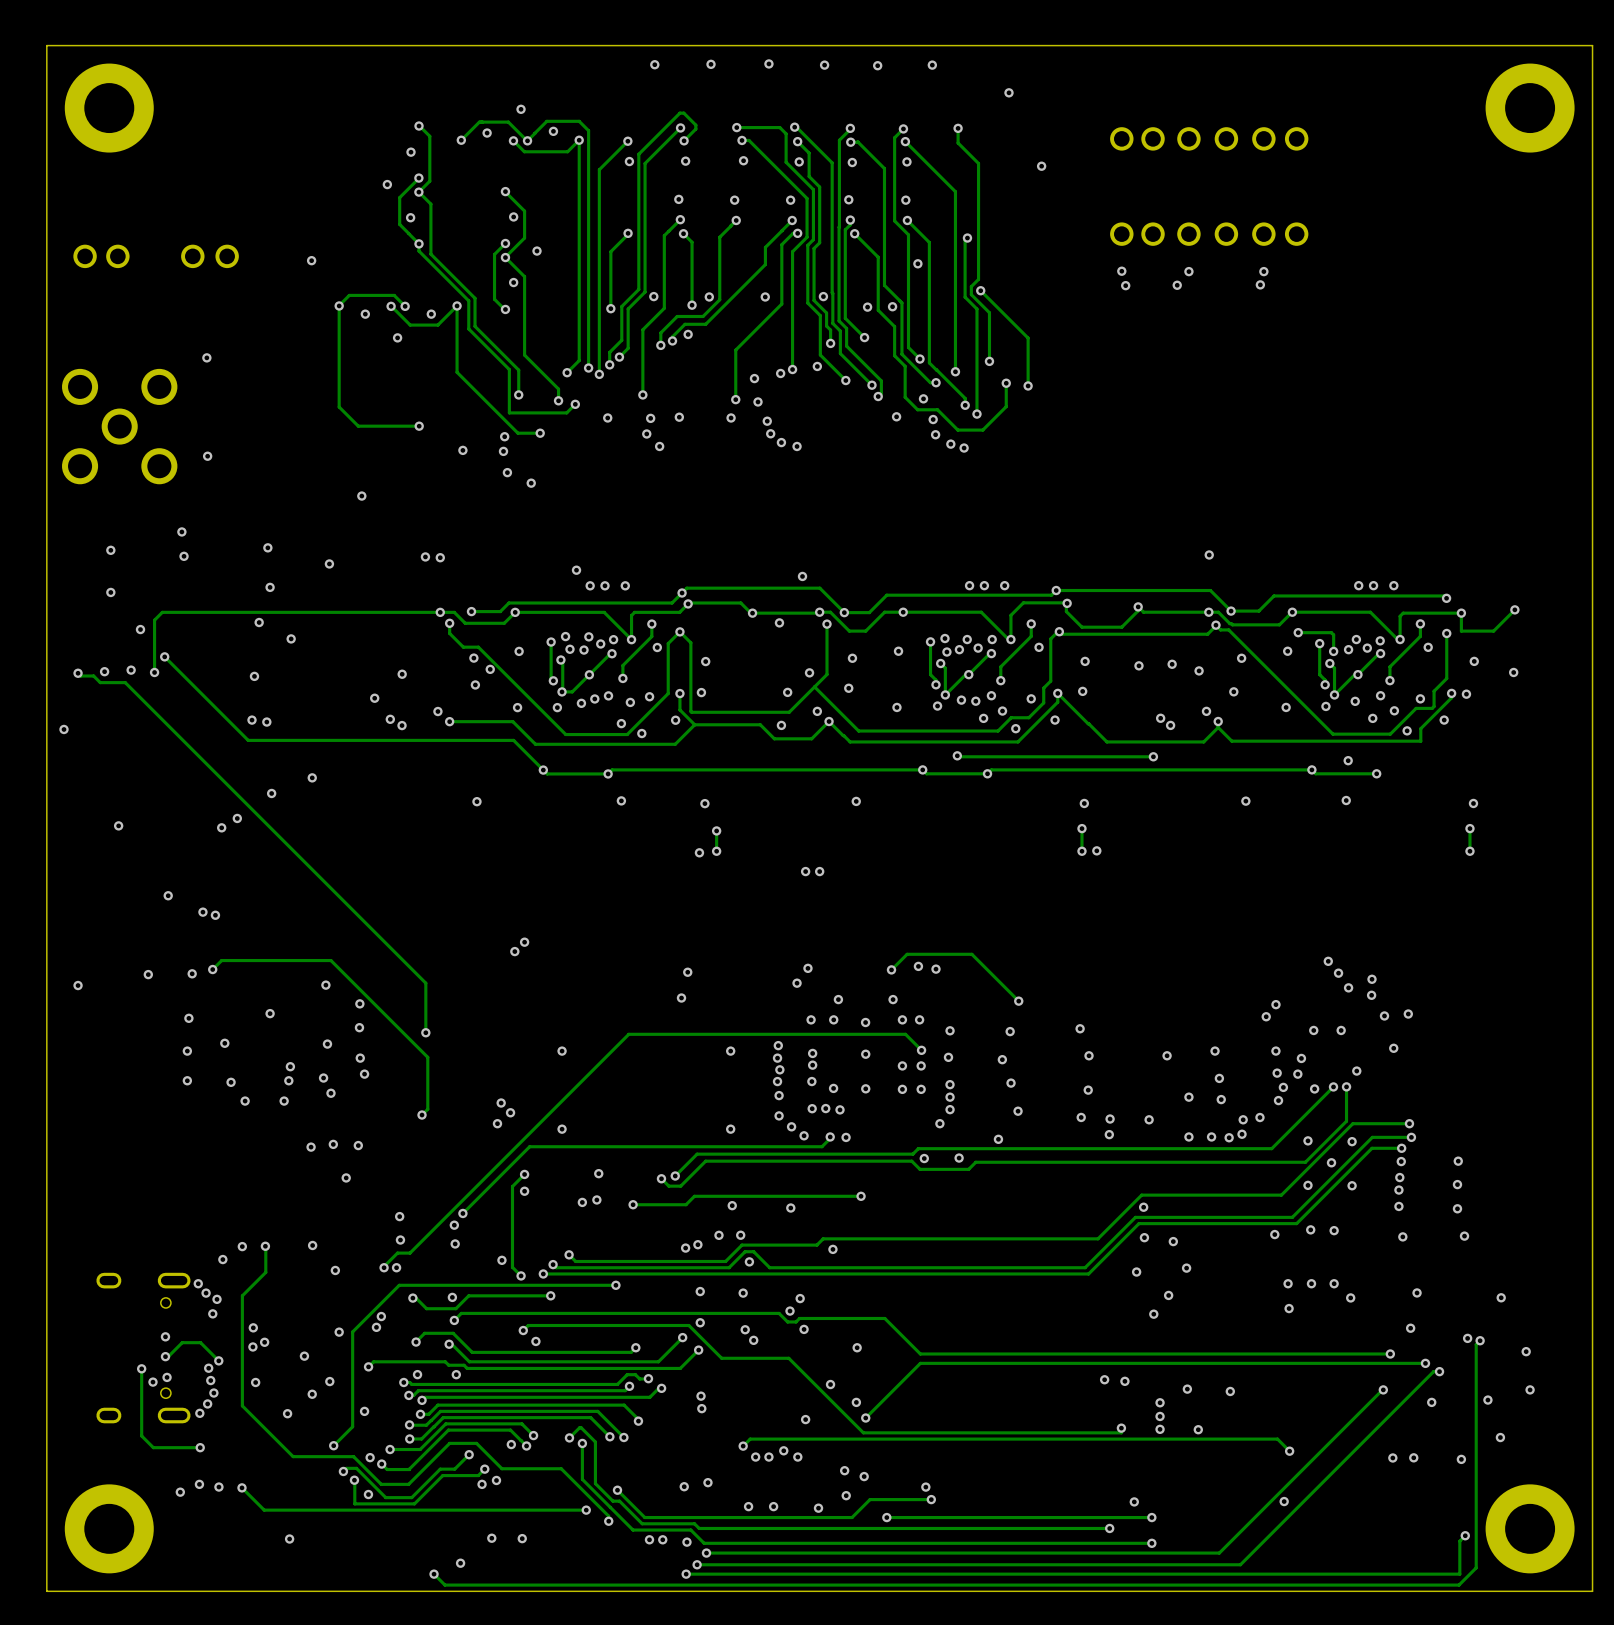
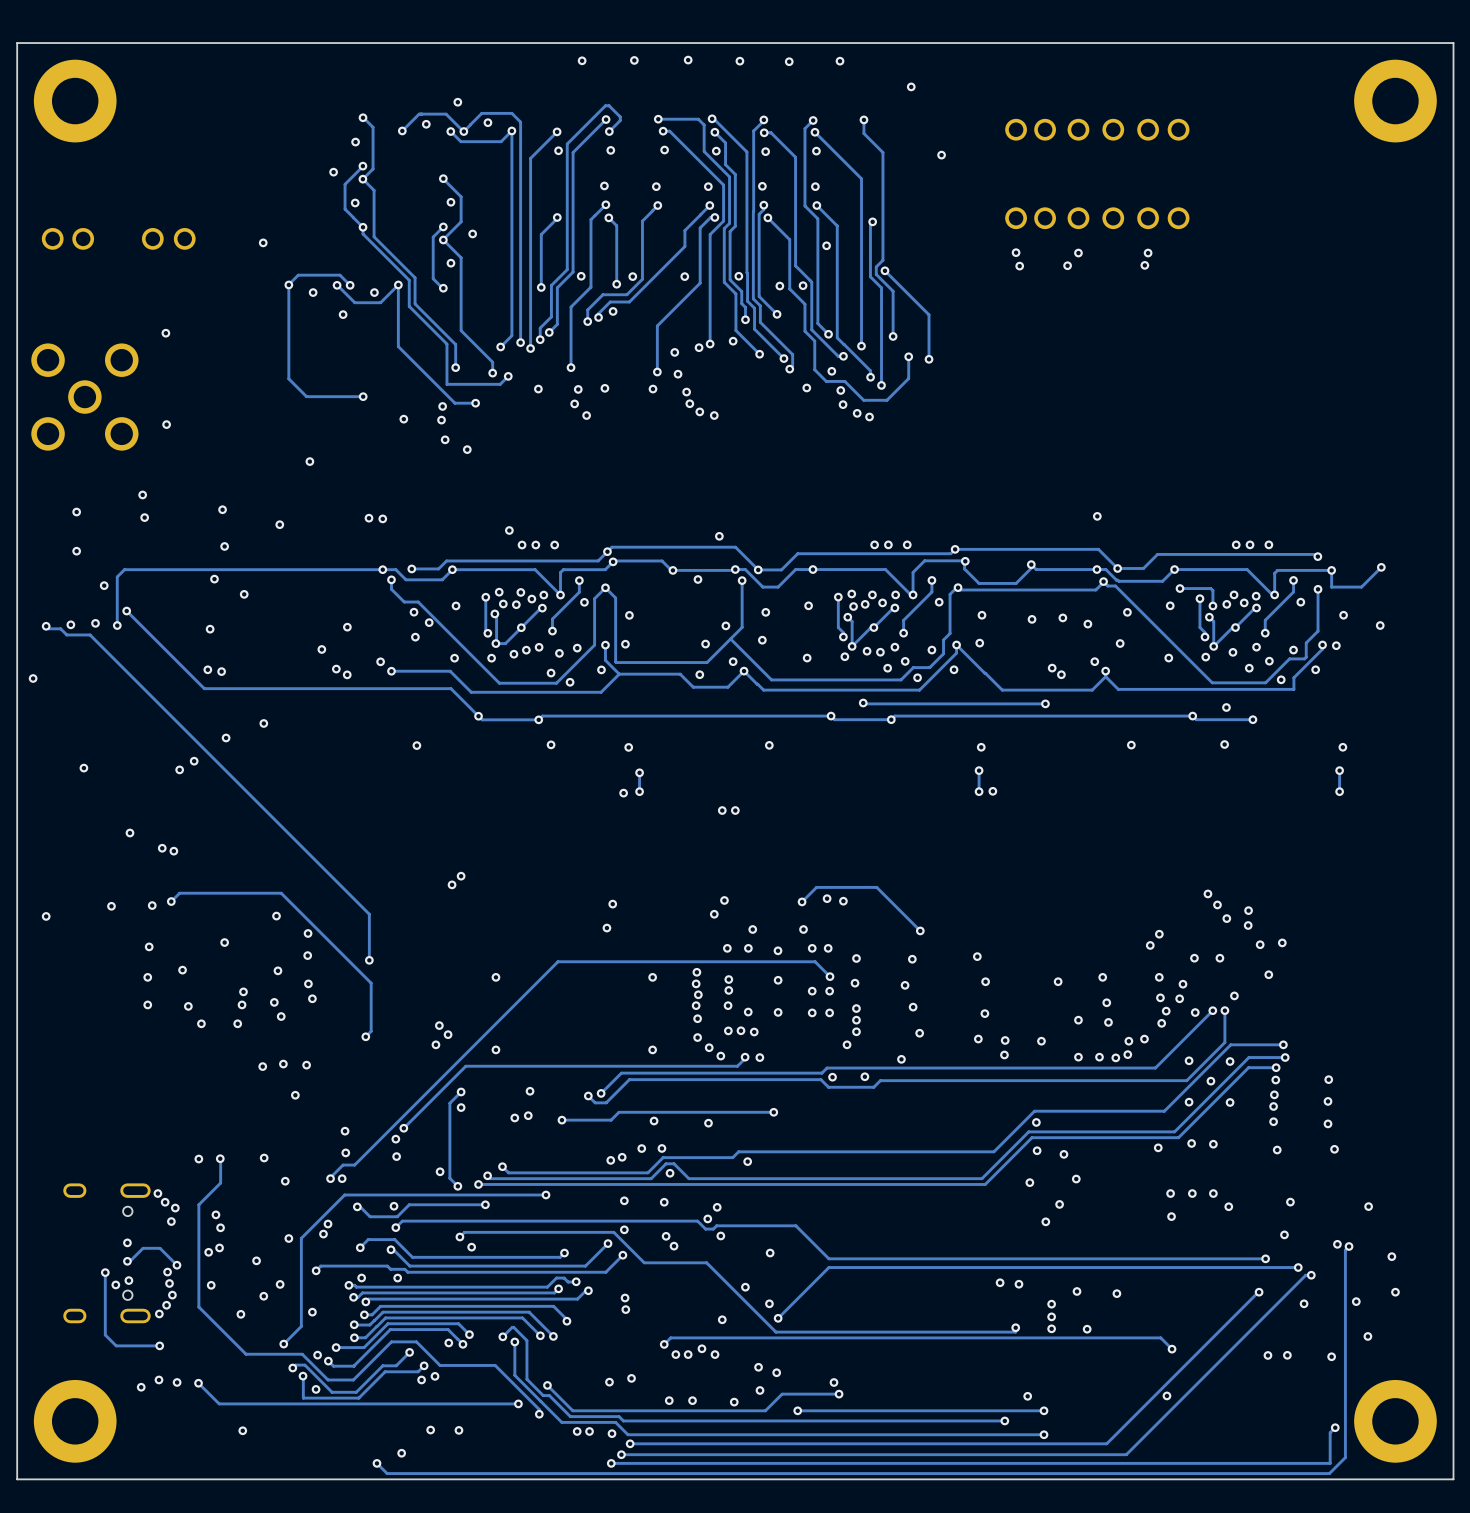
via: (222, 1259) -> none
via: none -> (215, 1214)
via: none -> (220, 1227)
via: (253, 1327) -> none

